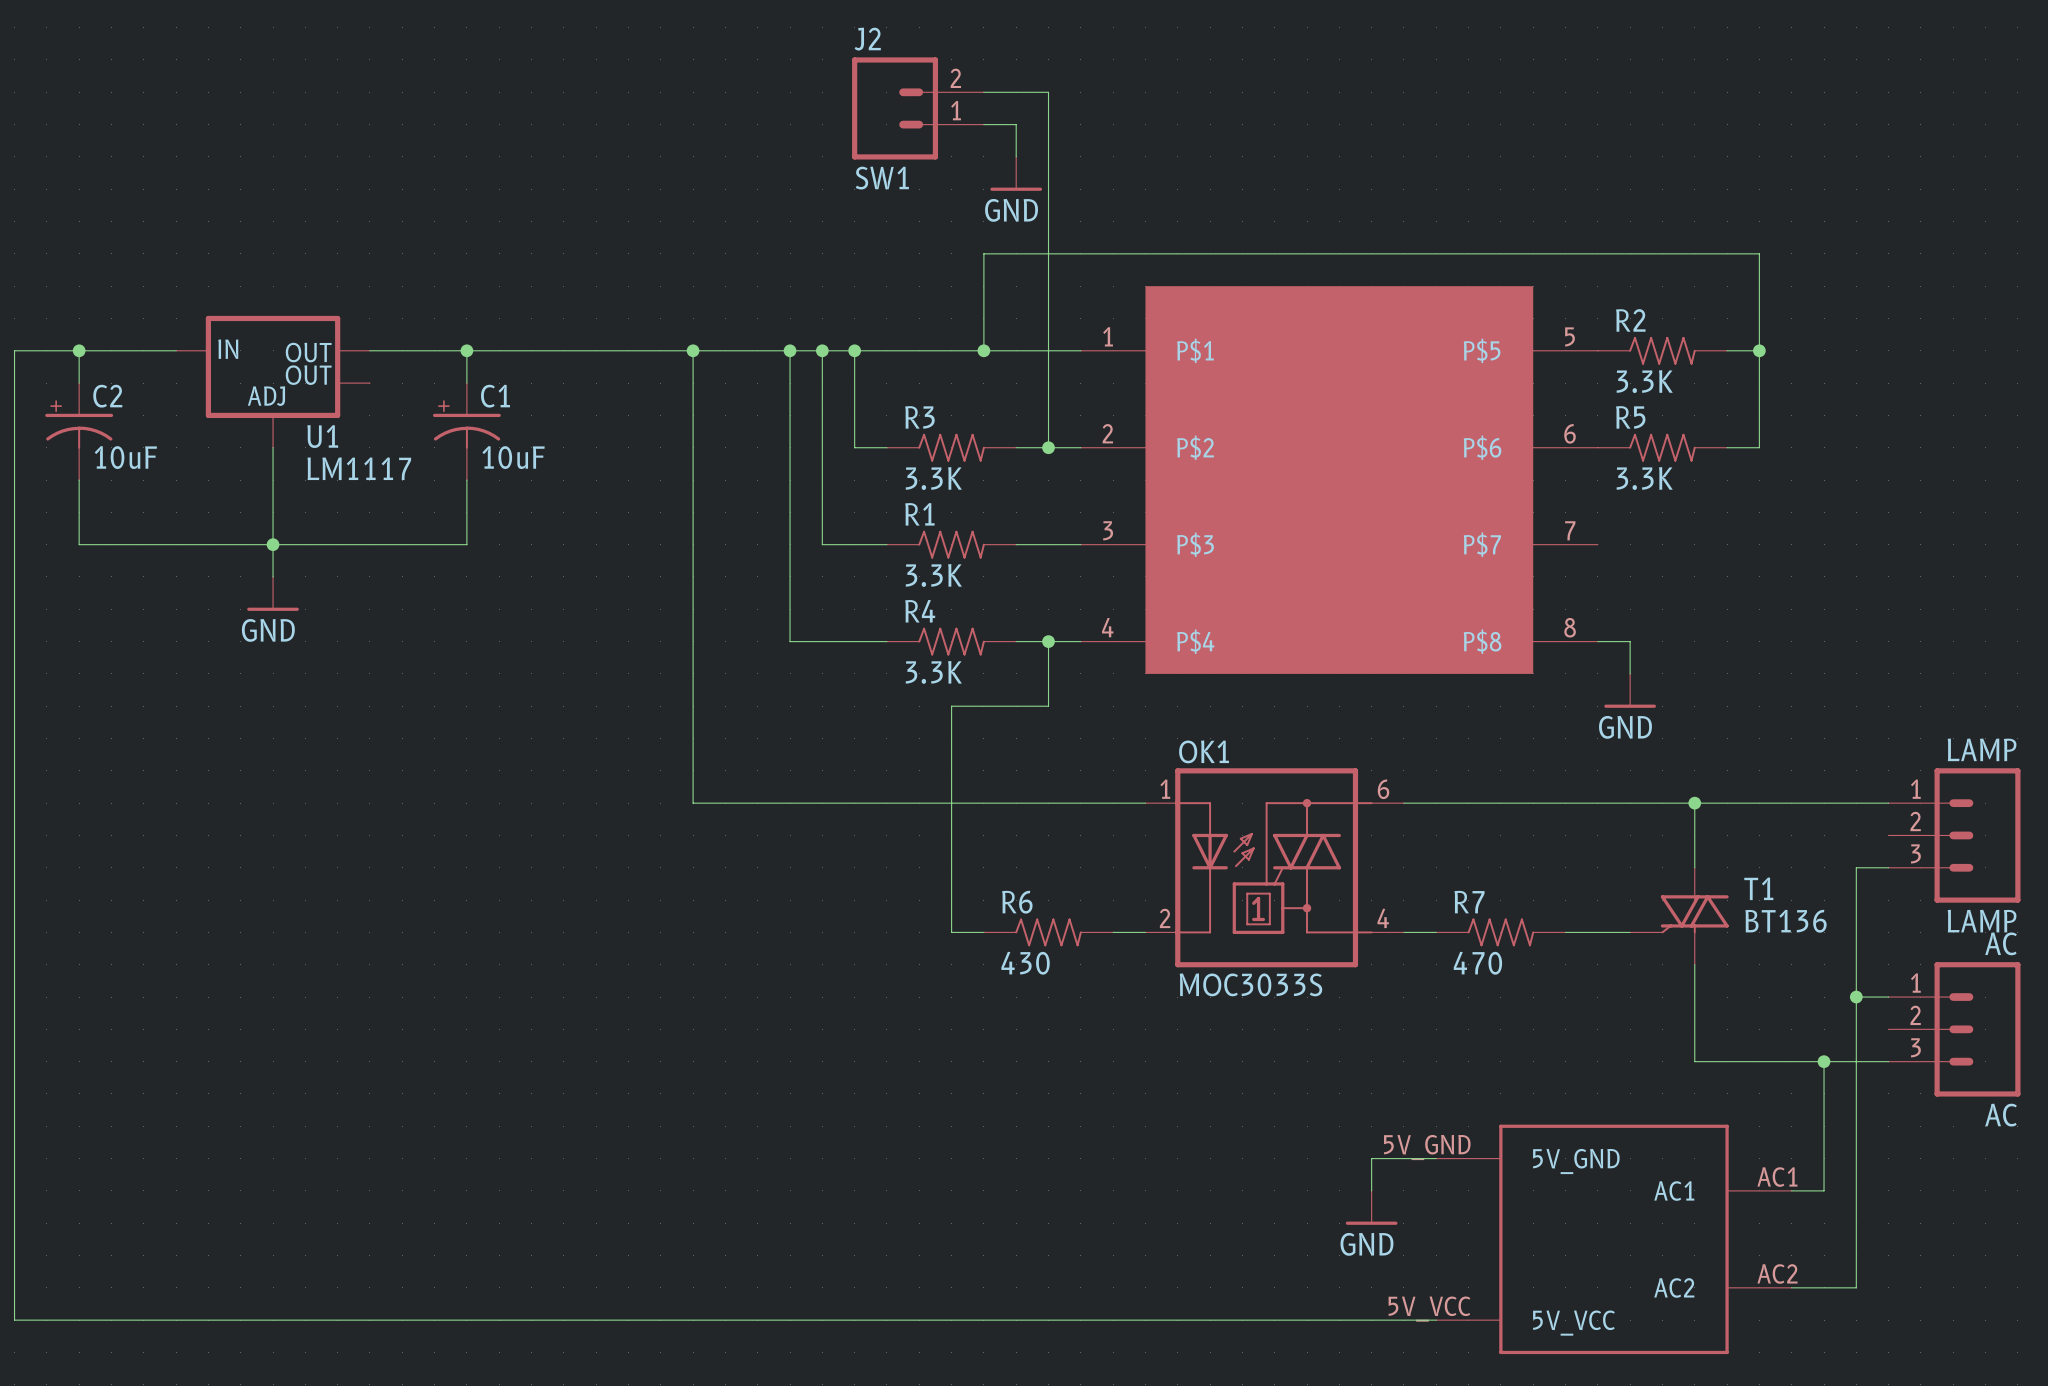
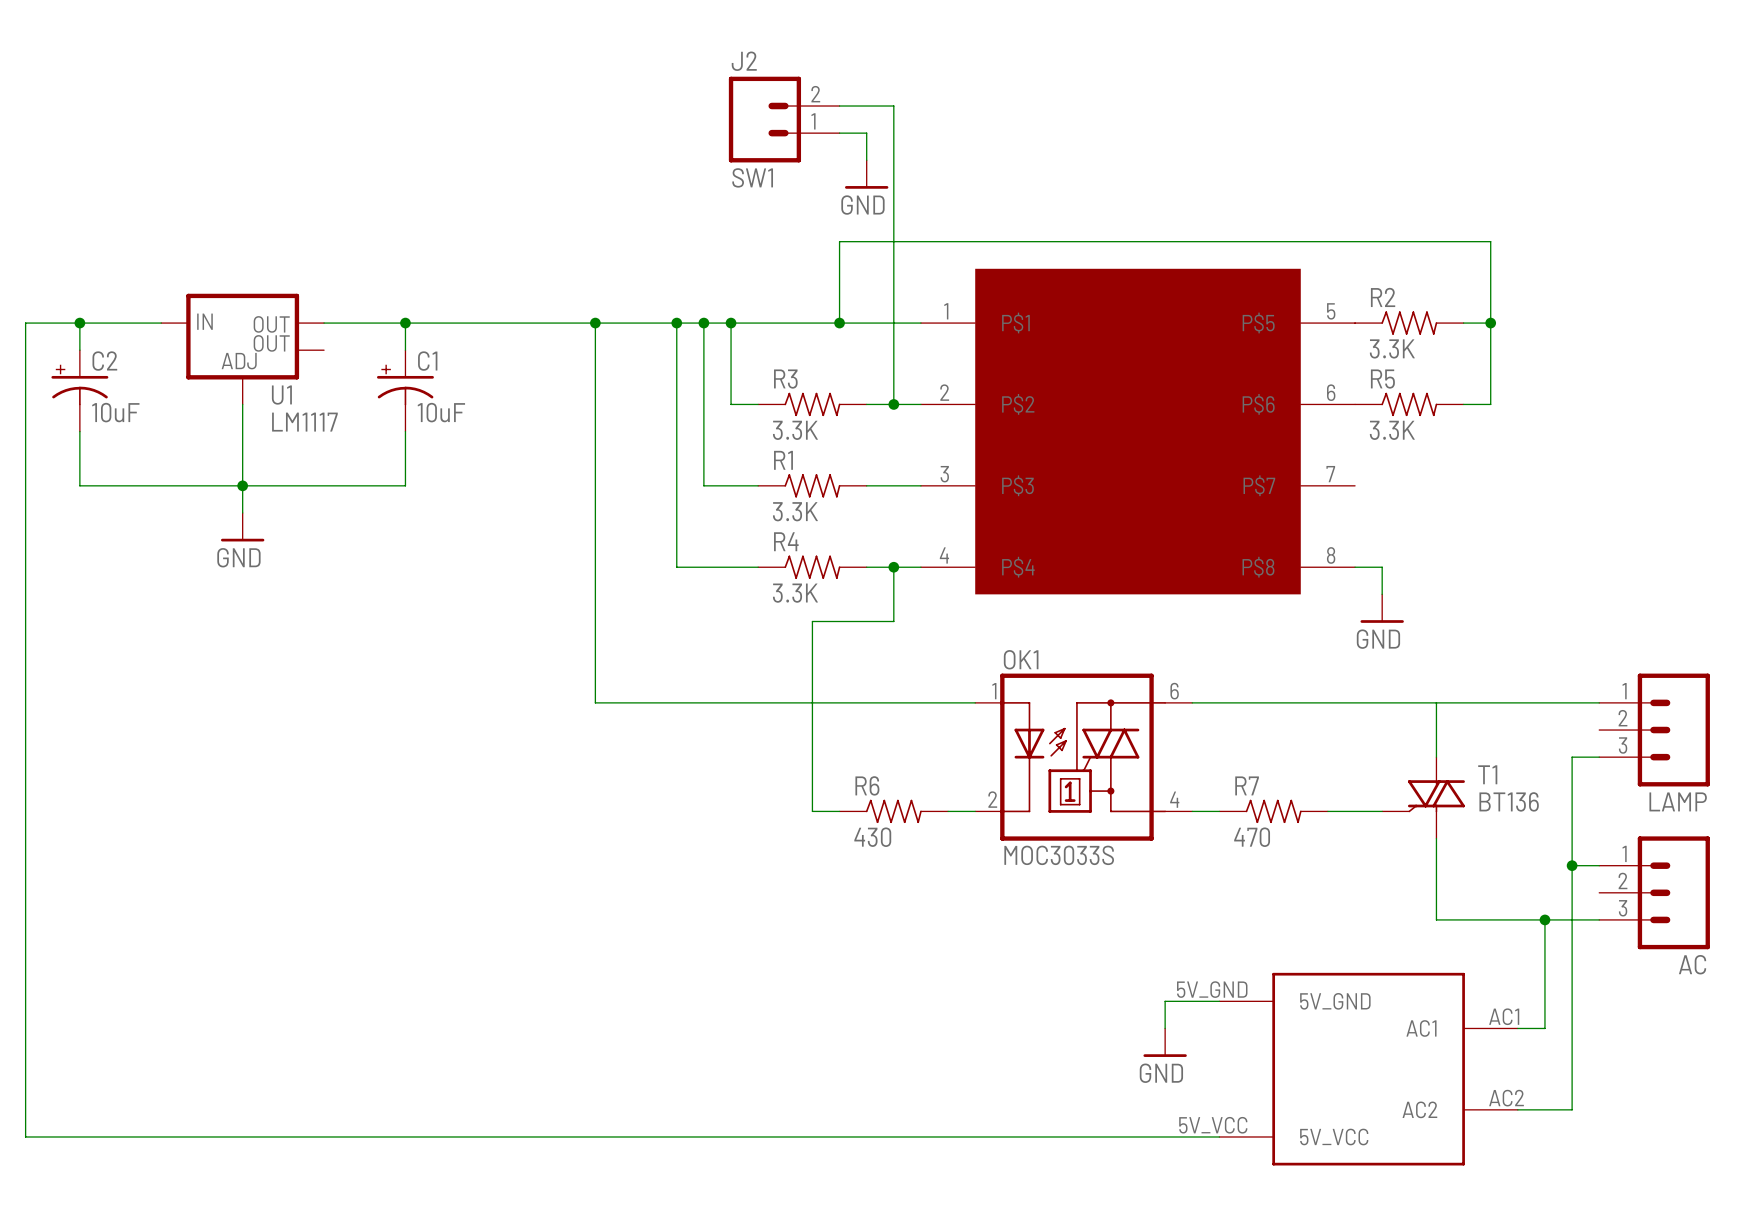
LAMP value: LAMP (1982, 749) -> none
junction: (1694, 803) -> none
AC value: AC (2001, 943) -> none

